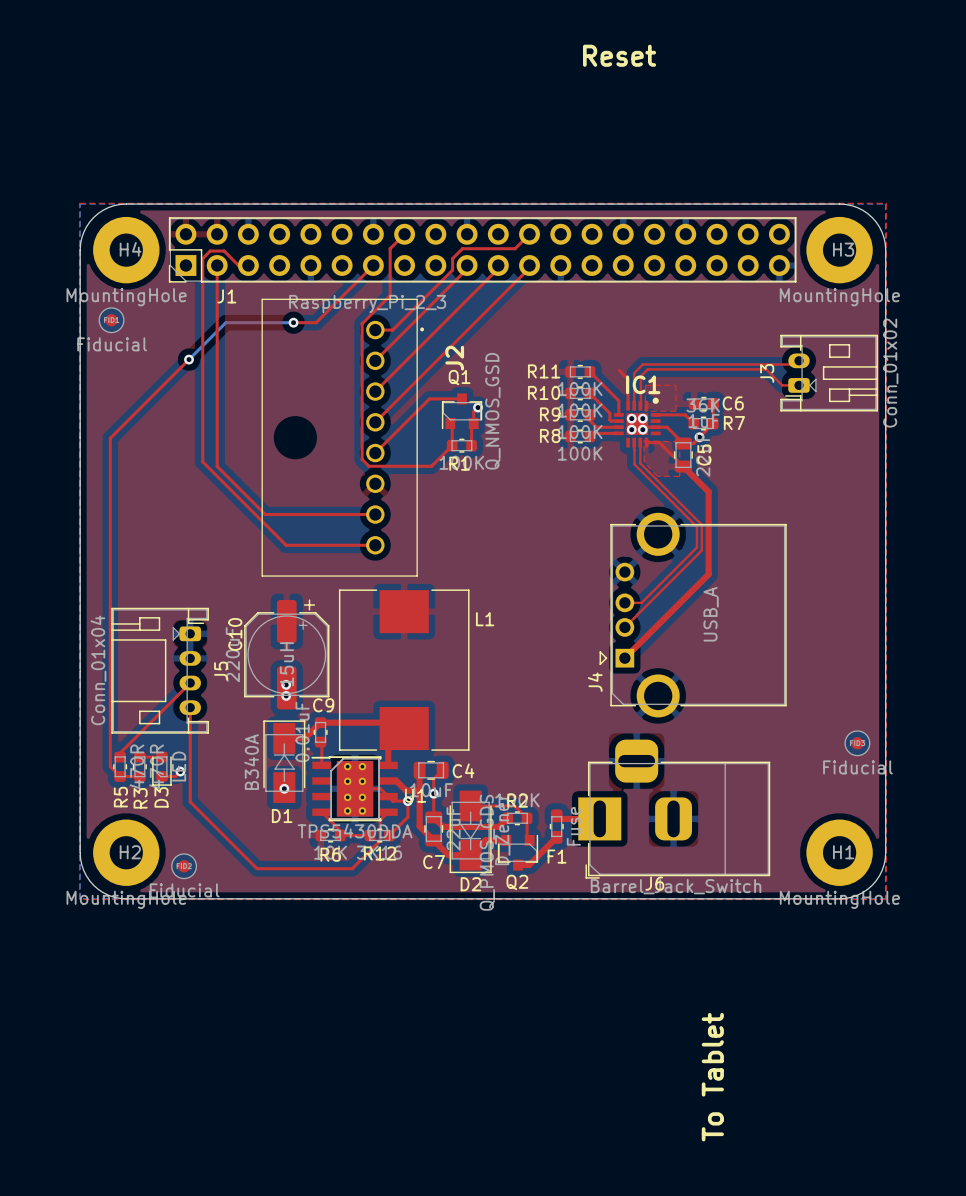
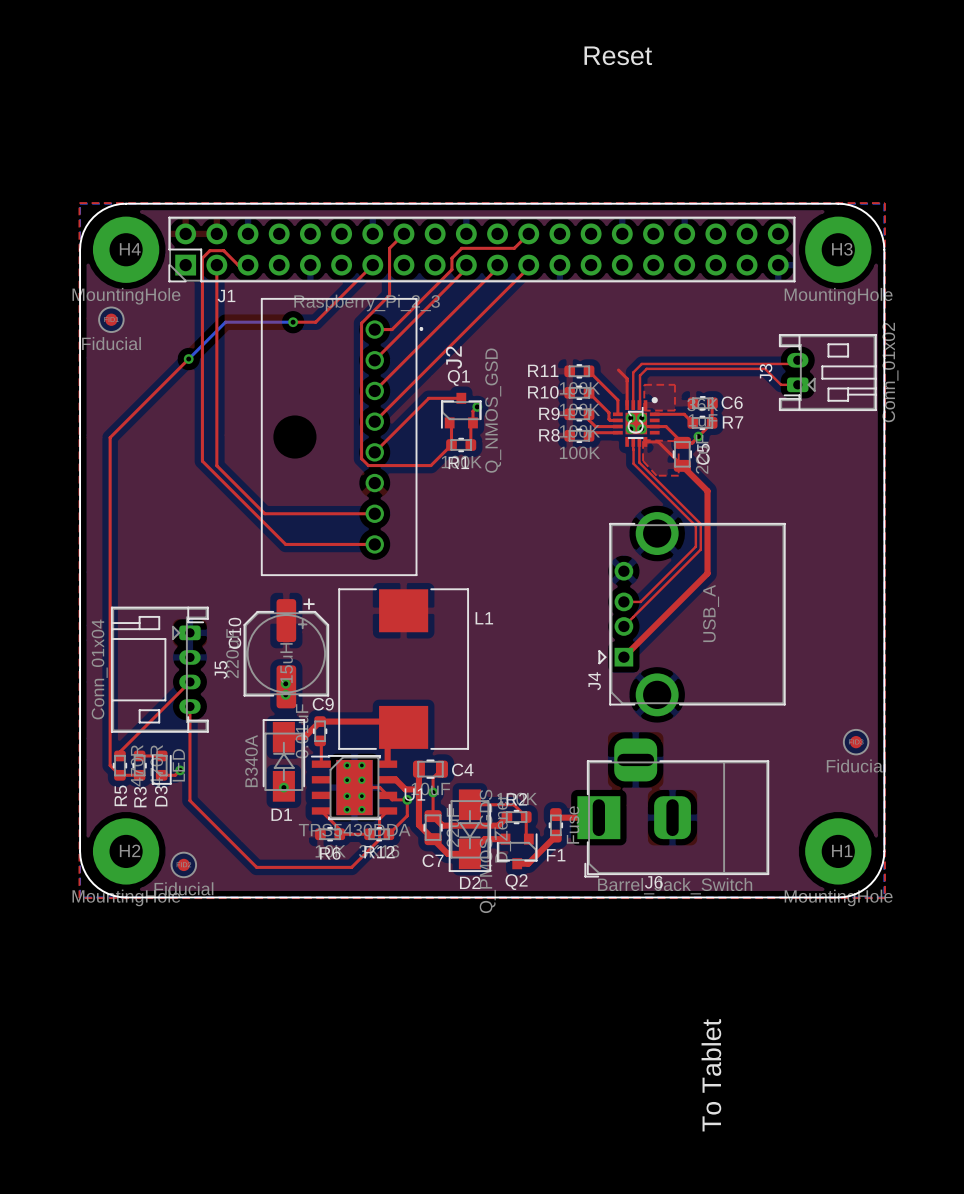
IC1 name rotation: 0° (643, 384) -> 90° counterclockwise (635, 423)

